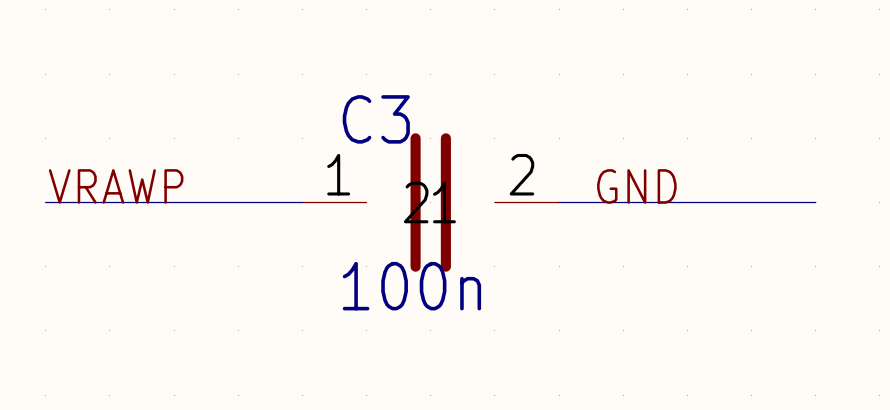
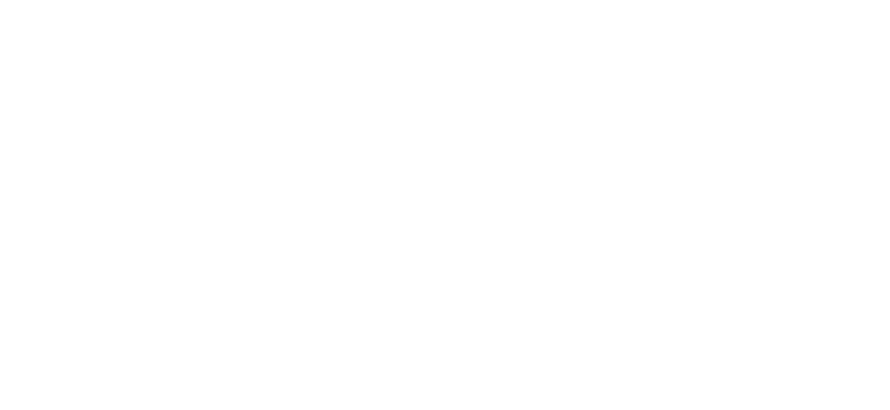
label: VRAWP (116, 186) -> none
label: GND (636, 186) -> none
wire: (45, 202) (302, 202) -> none
C3: 100n (430, 202) -> none
wire: (559, 202) (815, 202) -> none

